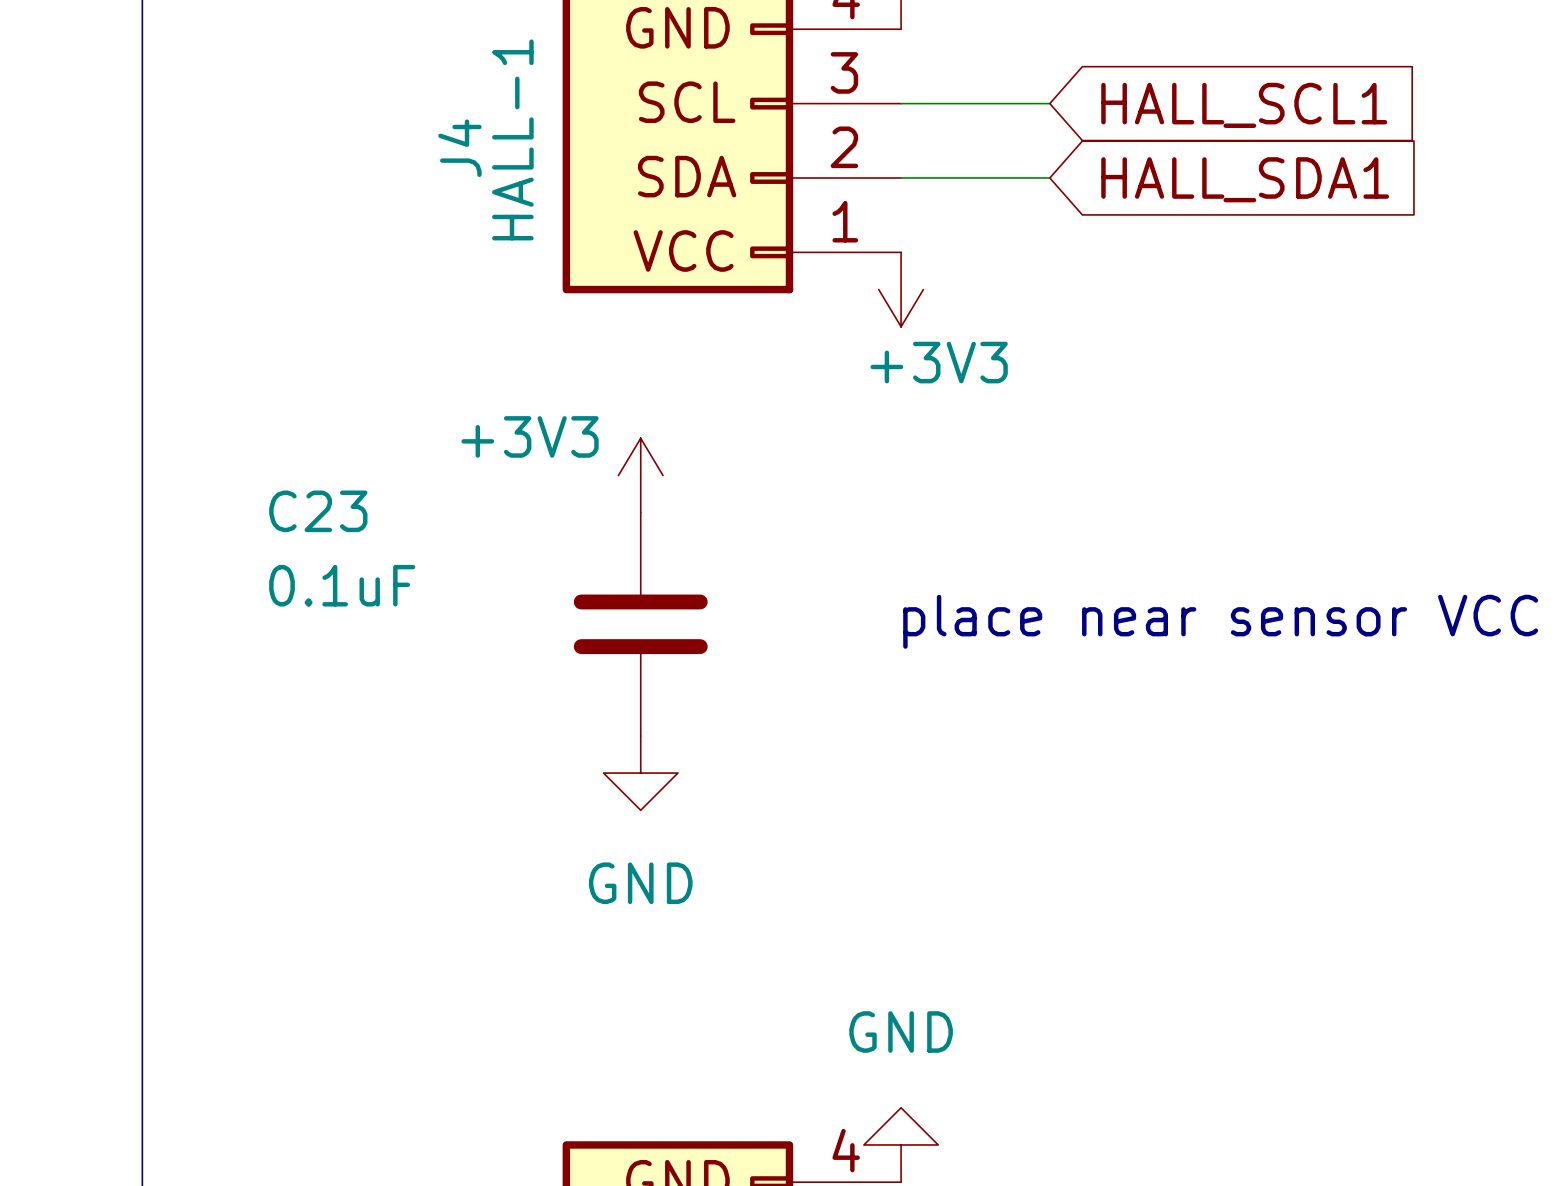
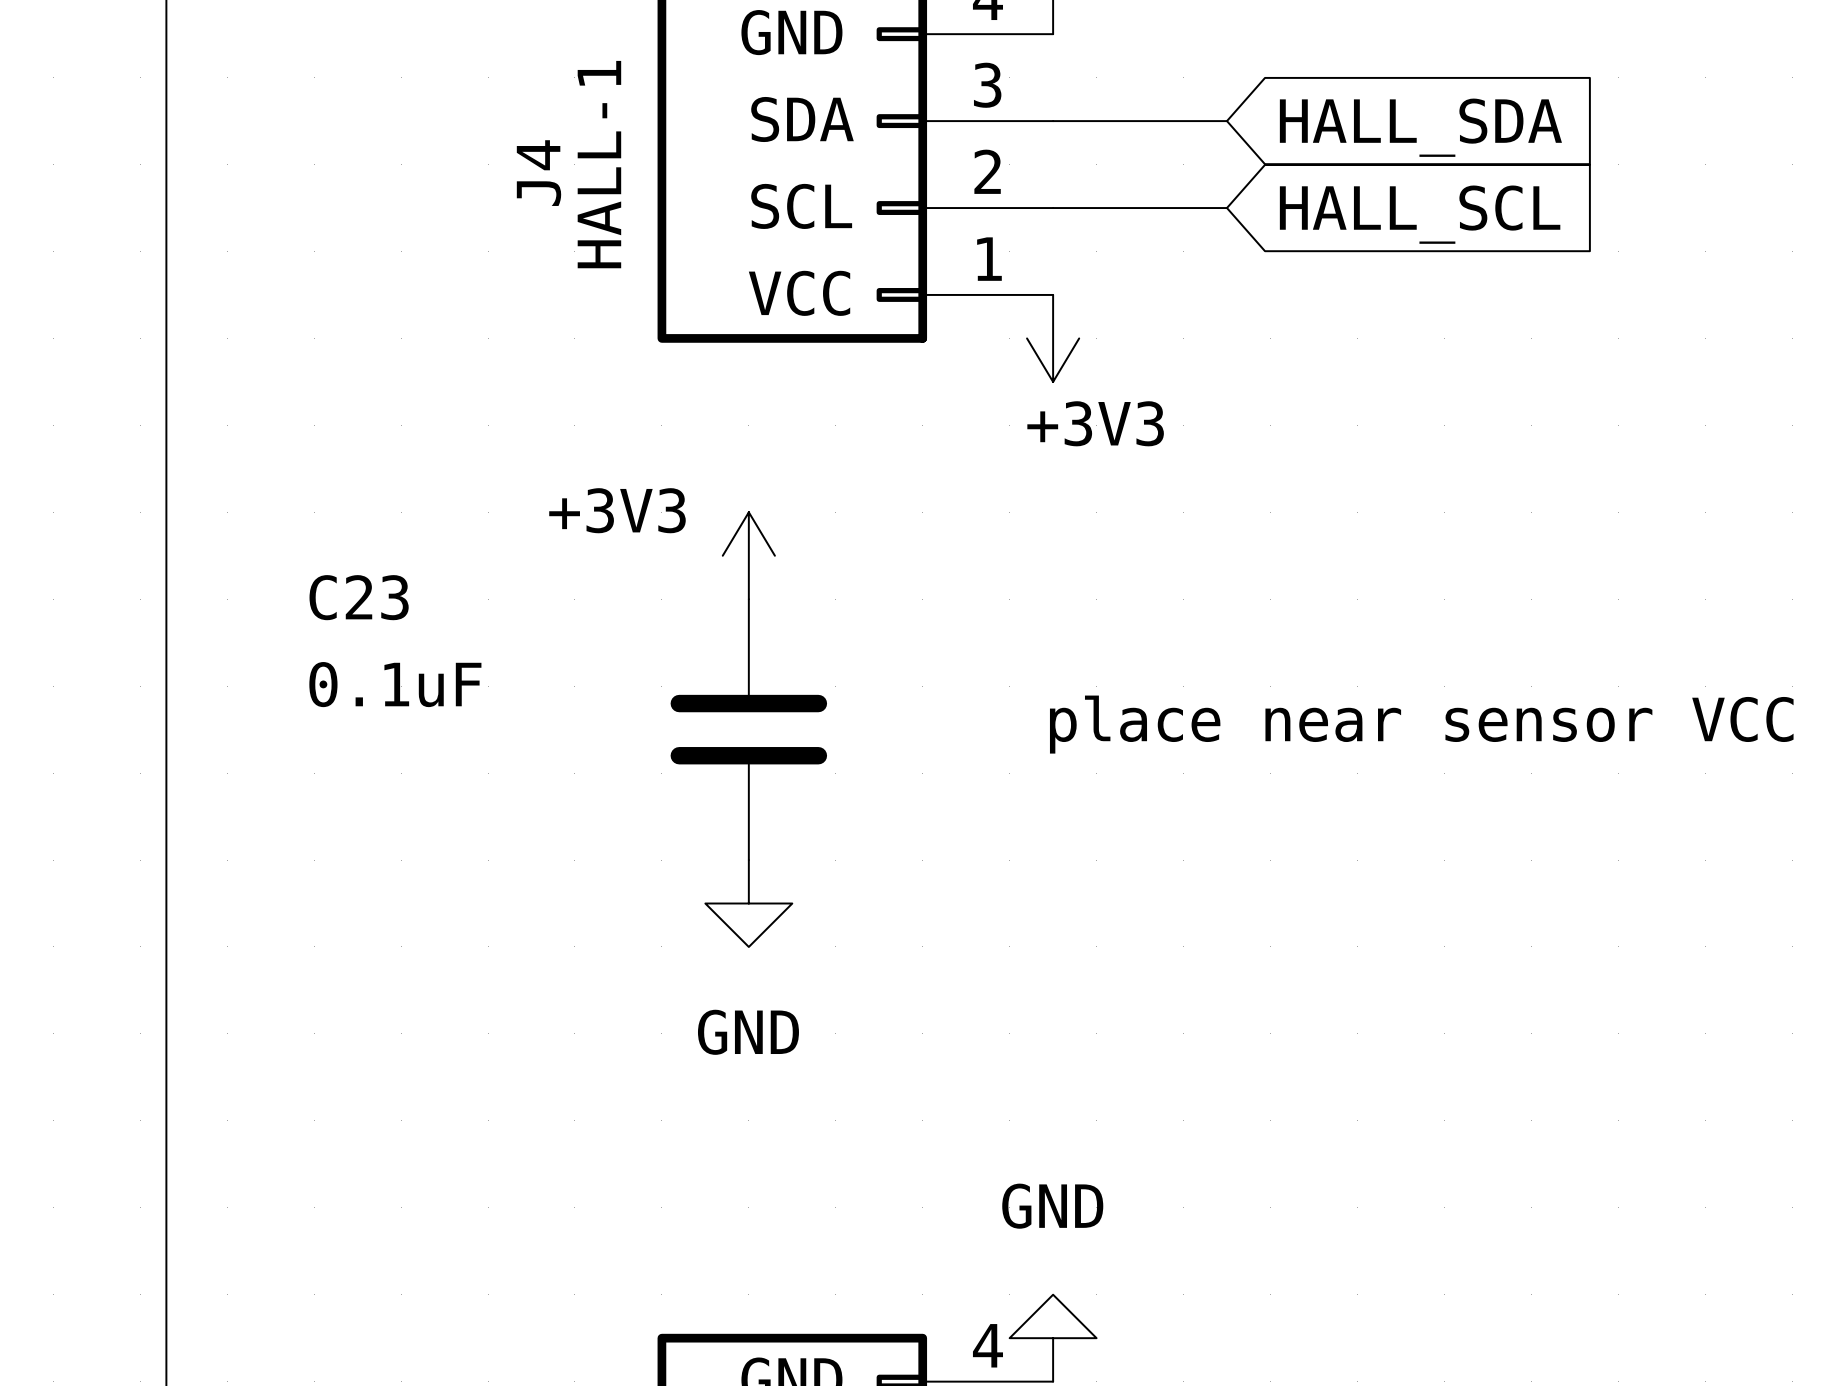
J4 text: SCL (687, 102) -> SDA (802, 119)
global label: HALL_SCL1 (1244, 105) -> HALL_SDA (1420, 127)
J4 text: SDA (687, 176) -> SCL (801, 206)
global label: HALL_SDA1 (1245, 179) -> HALL_SCL (1420, 214)

